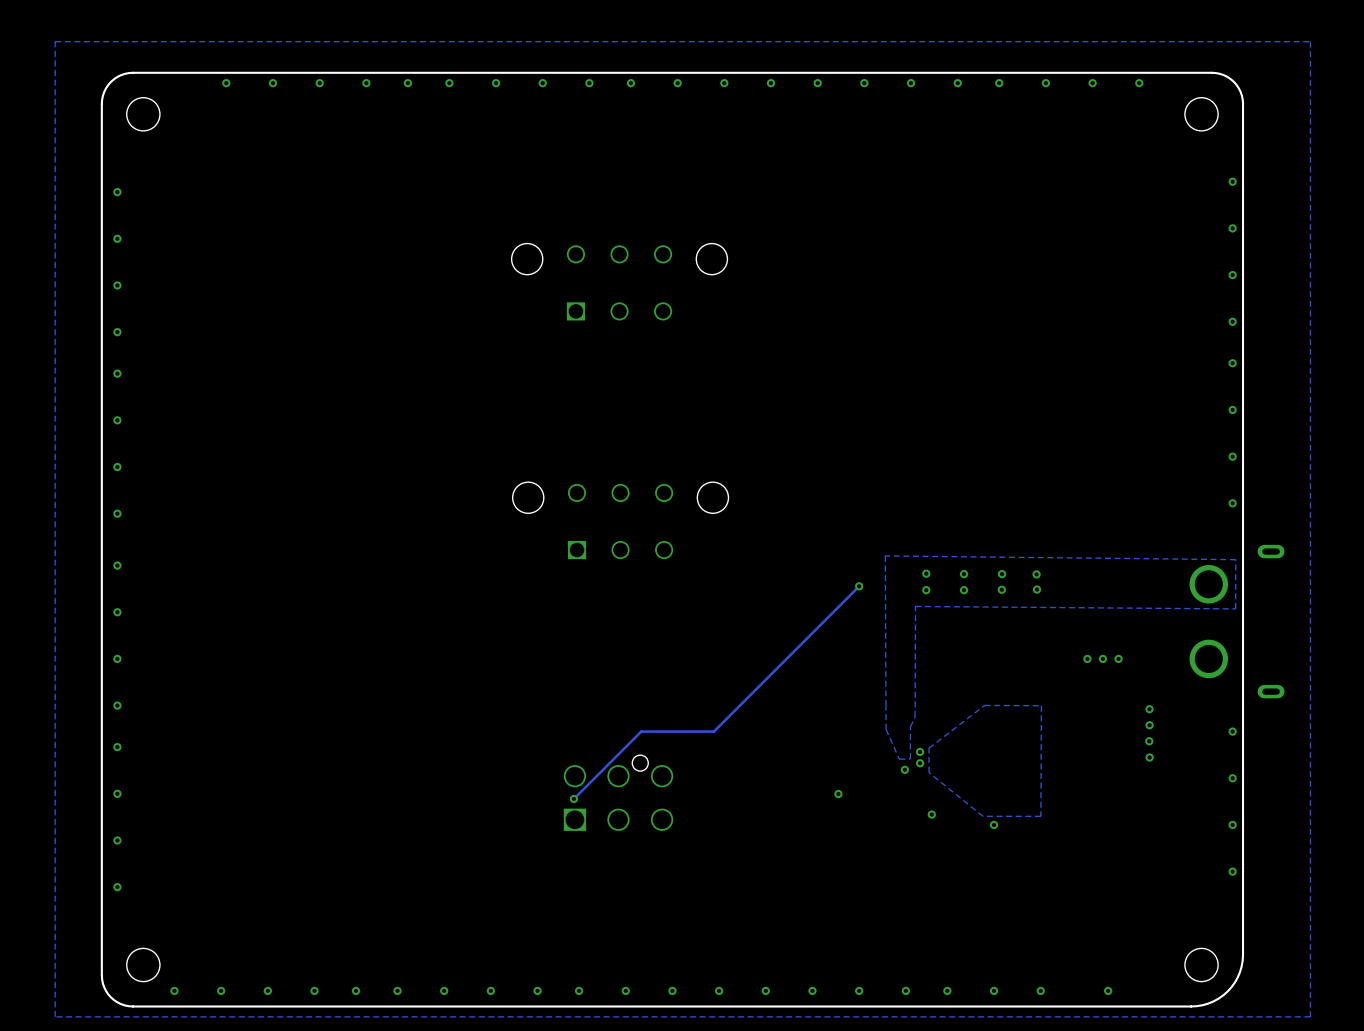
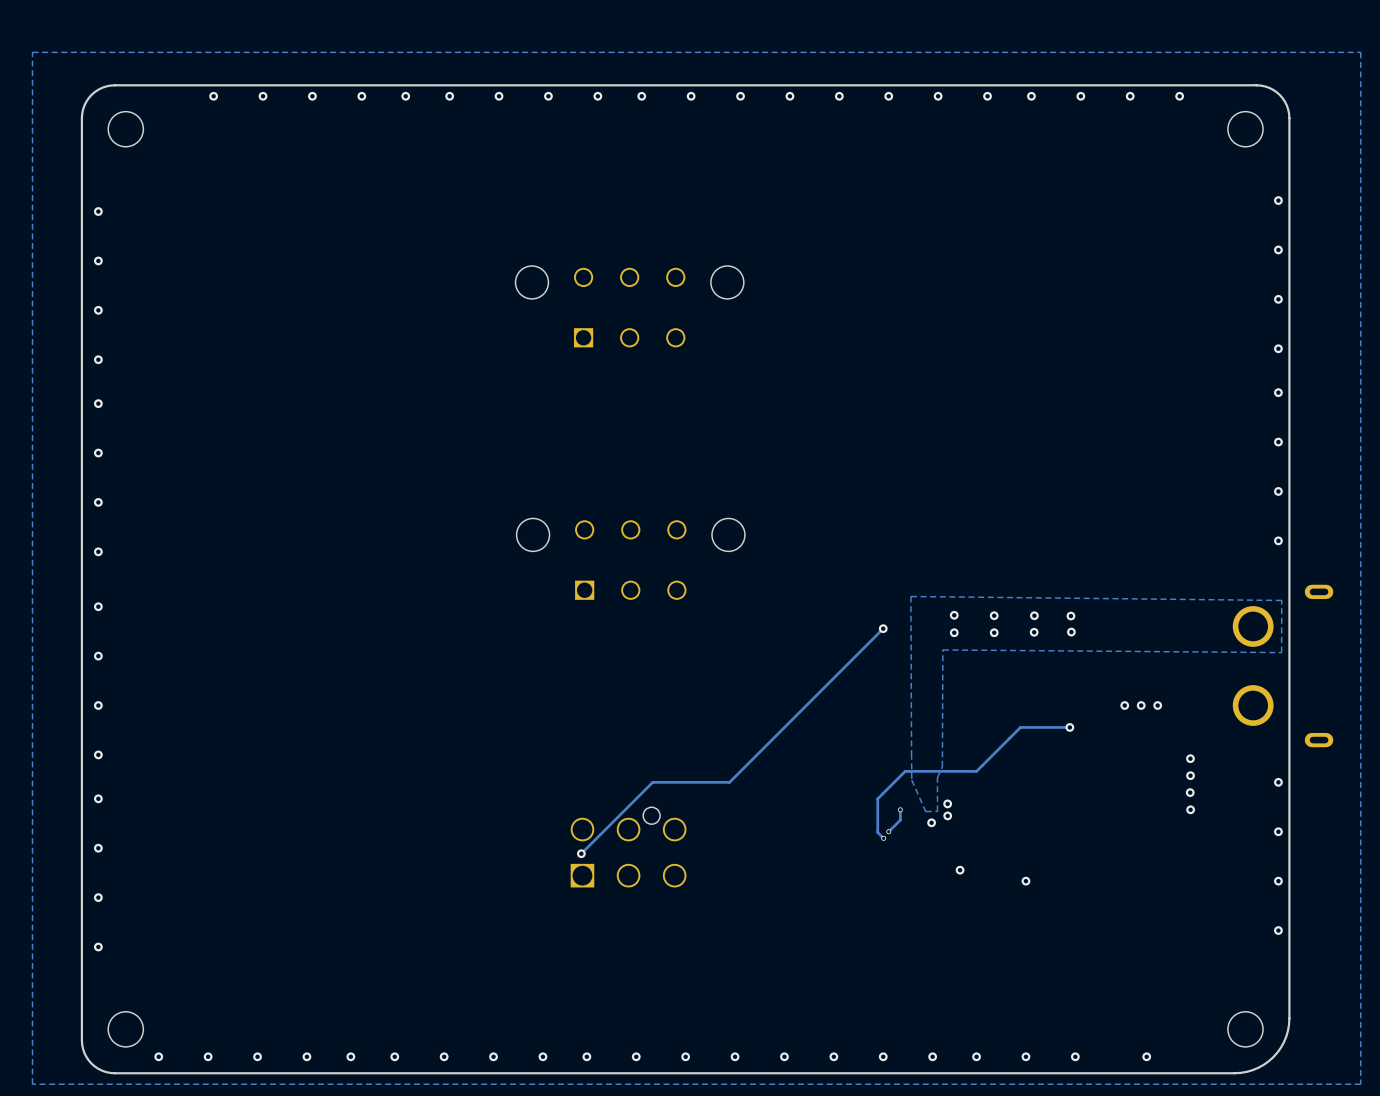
track: none -> (1069, 727) (1020, 727) (976, 771) (905, 771) (877, 798) (877, 832) (883, 838)
via: none -> (1069, 727)
zone outline: (984, 705) (928, 748) (929, 772) (982, 816) (1040, 816) (1041, 705) (984, 705) -> none
track: none -> (900, 809) (900, 820) (888, 831)
via: none -> (900, 809)
via: none -> (888, 831)
via: none -> (883, 838)
via: (838, 794) -> none

